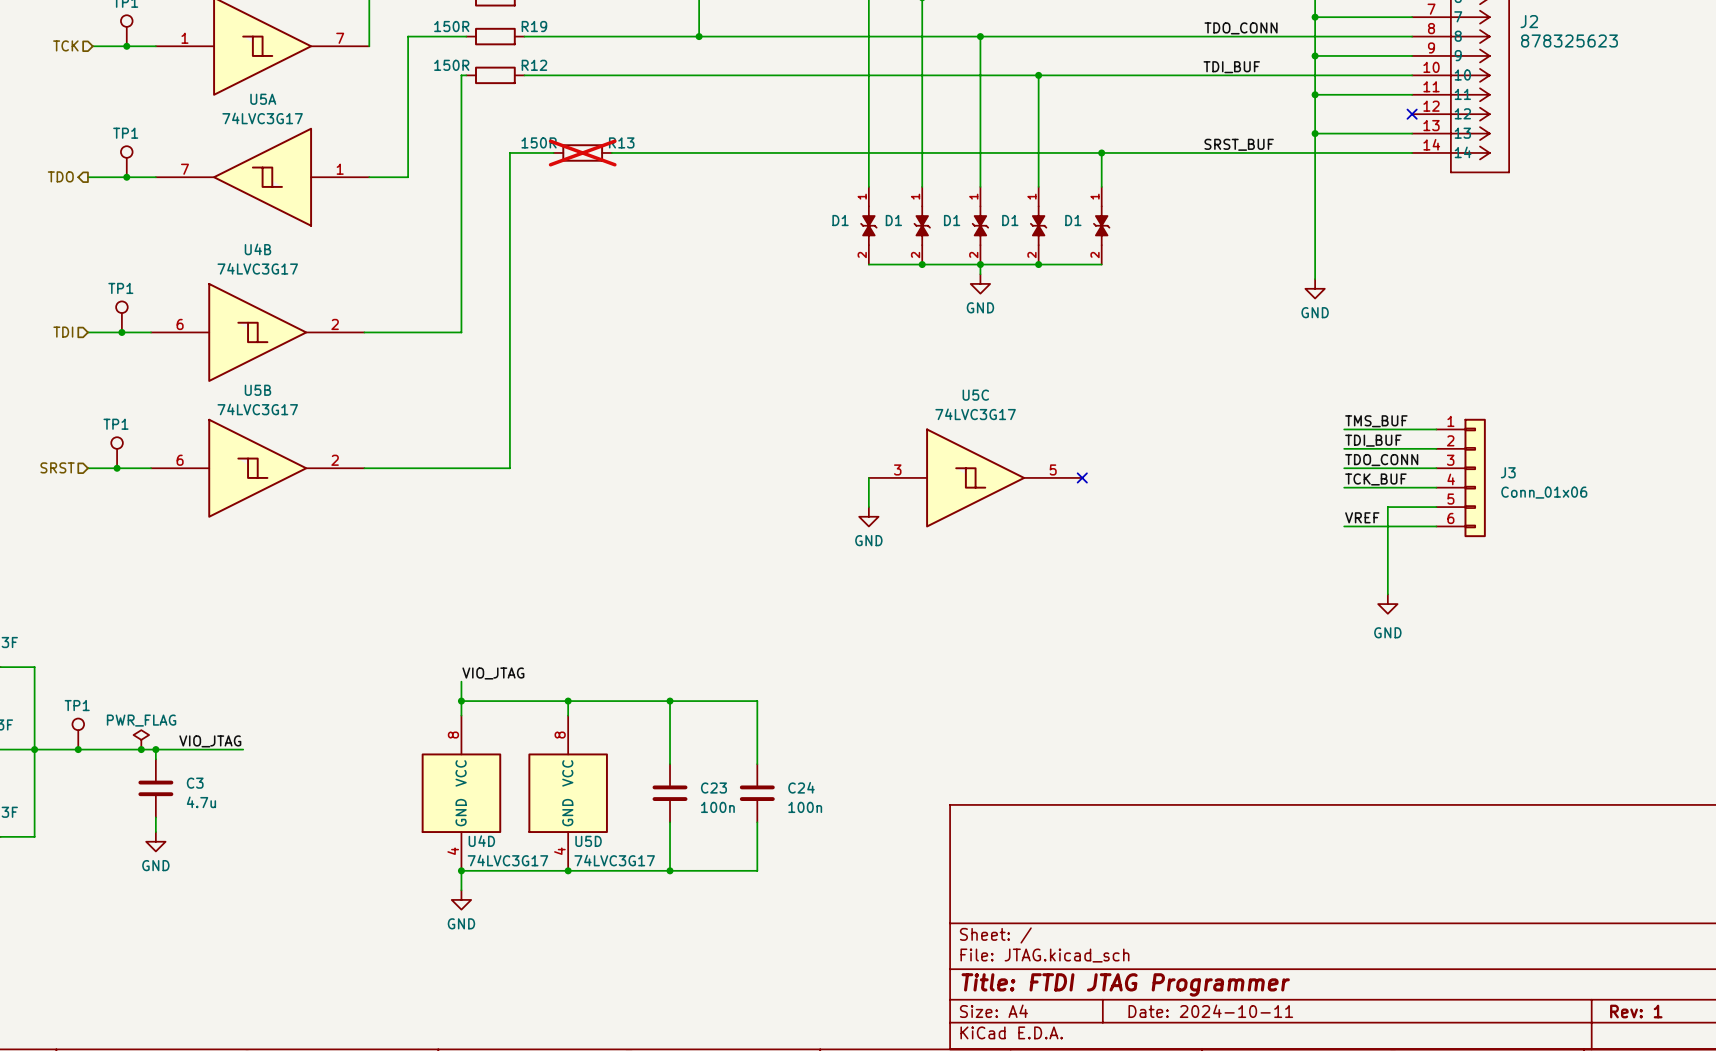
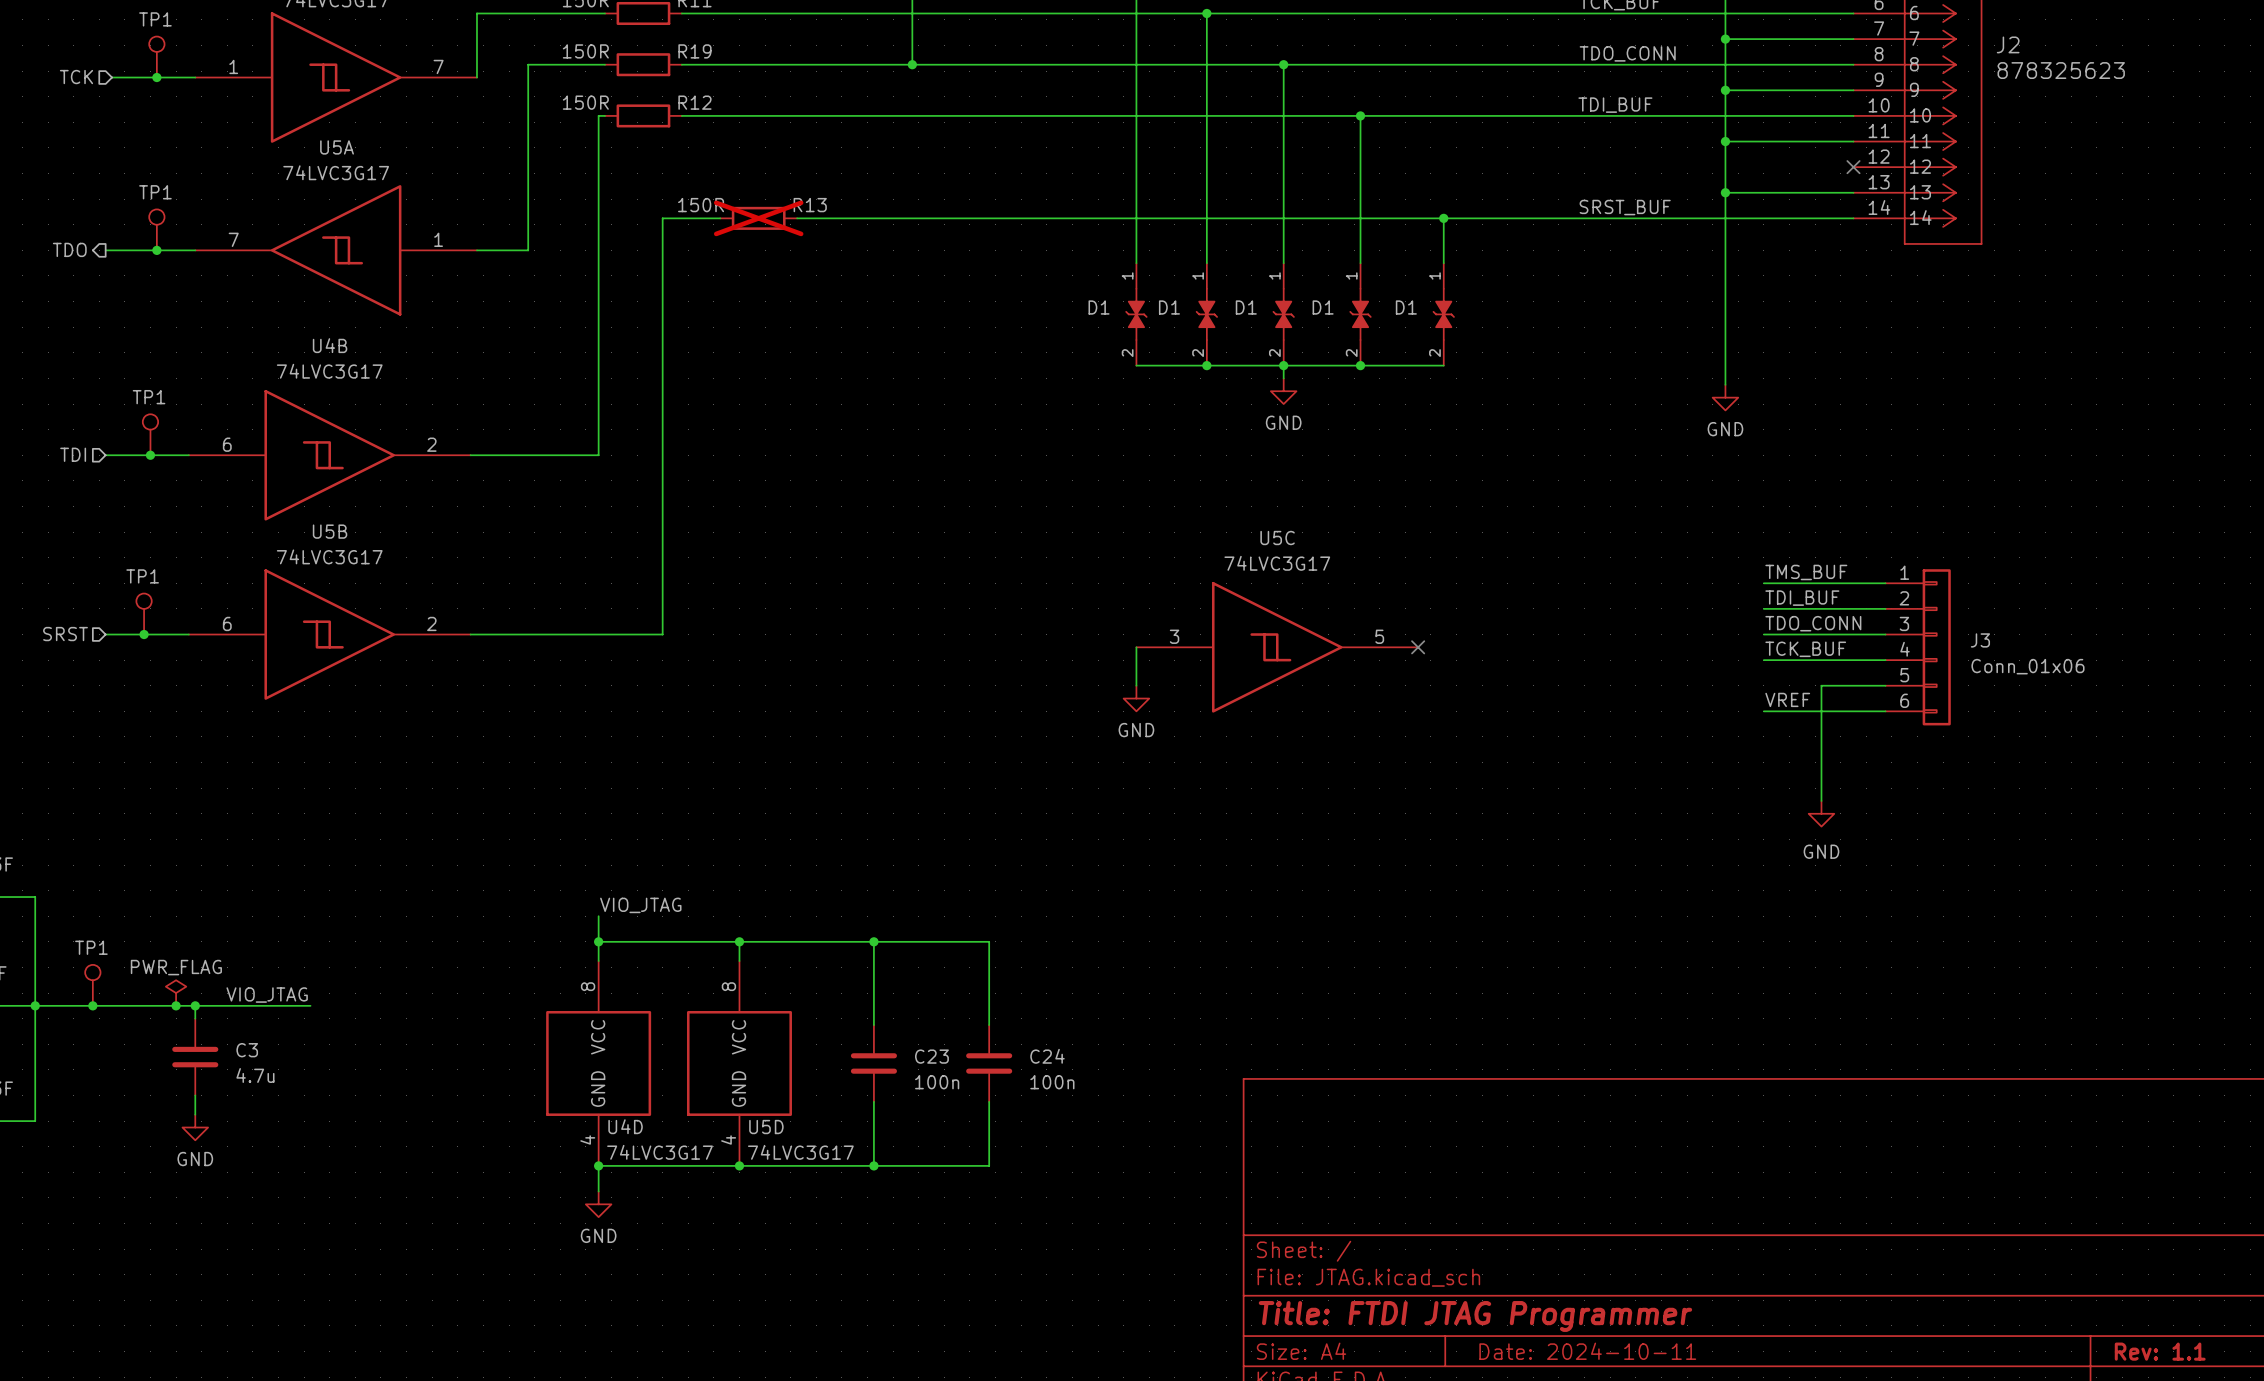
title block: Rev: 1 (1636, 1011) -> Rev: 1.1 (2160, 1351)

